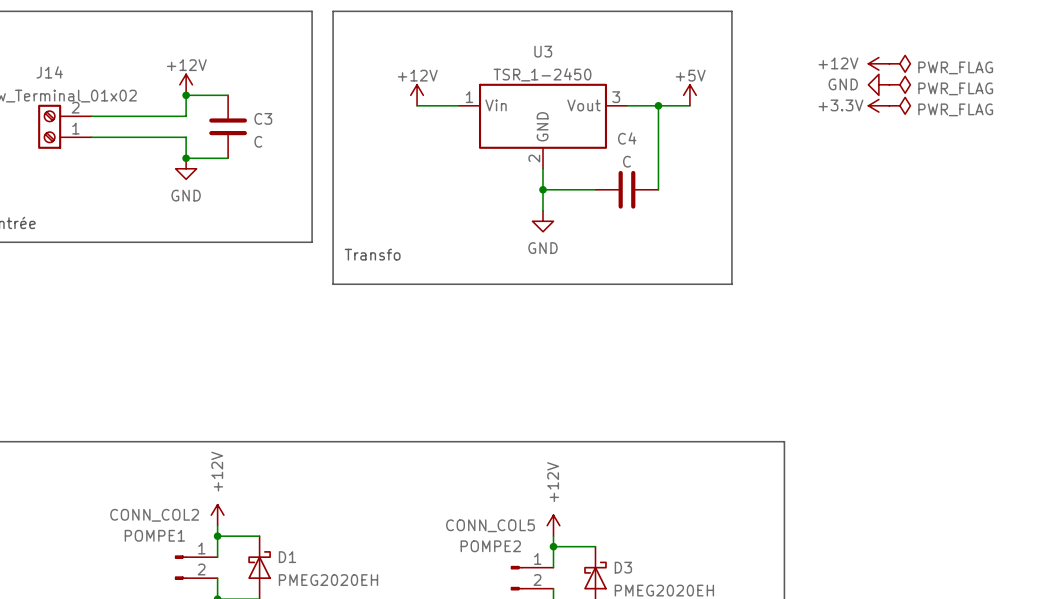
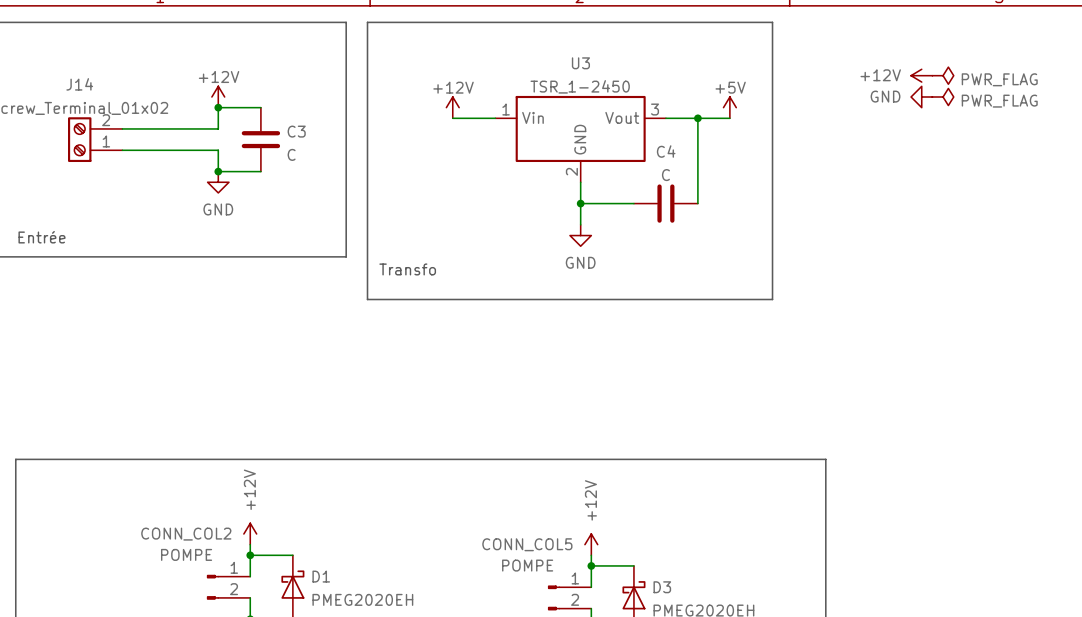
power symbol: +3.3V (878, 105) -> none
power symbol: PWR_FLAG (899, 105) -> none
CONN_COL2 value: POMPE1 (154, 535) -> POMPE (186, 554)
CONN_COL5 value: POMPE2 (490, 546) -> POMPE (527, 565)

